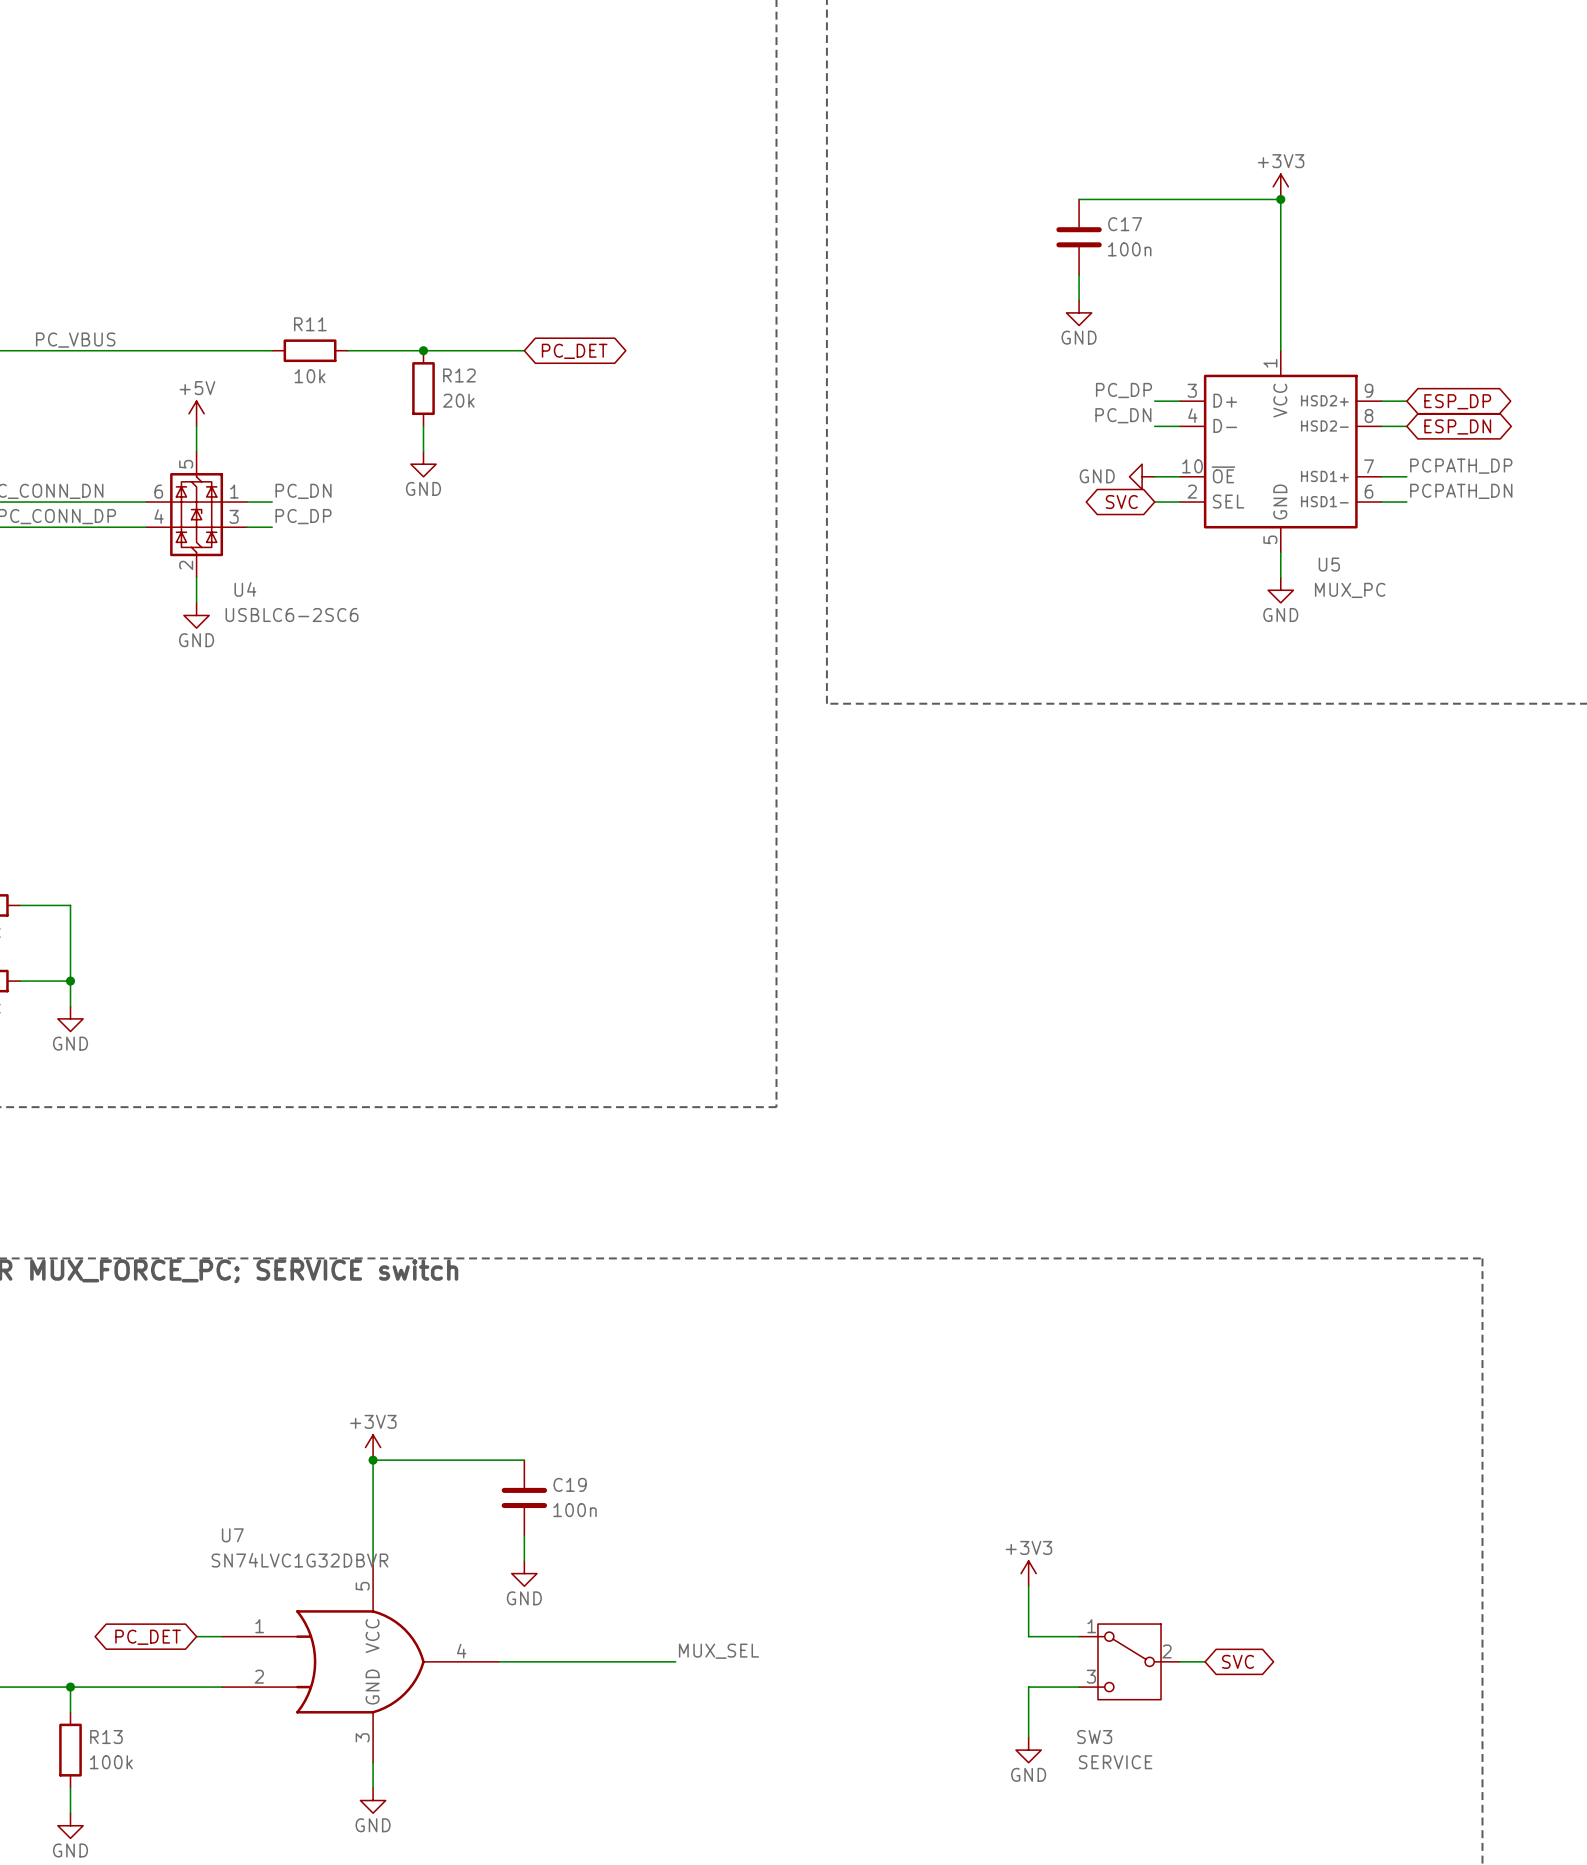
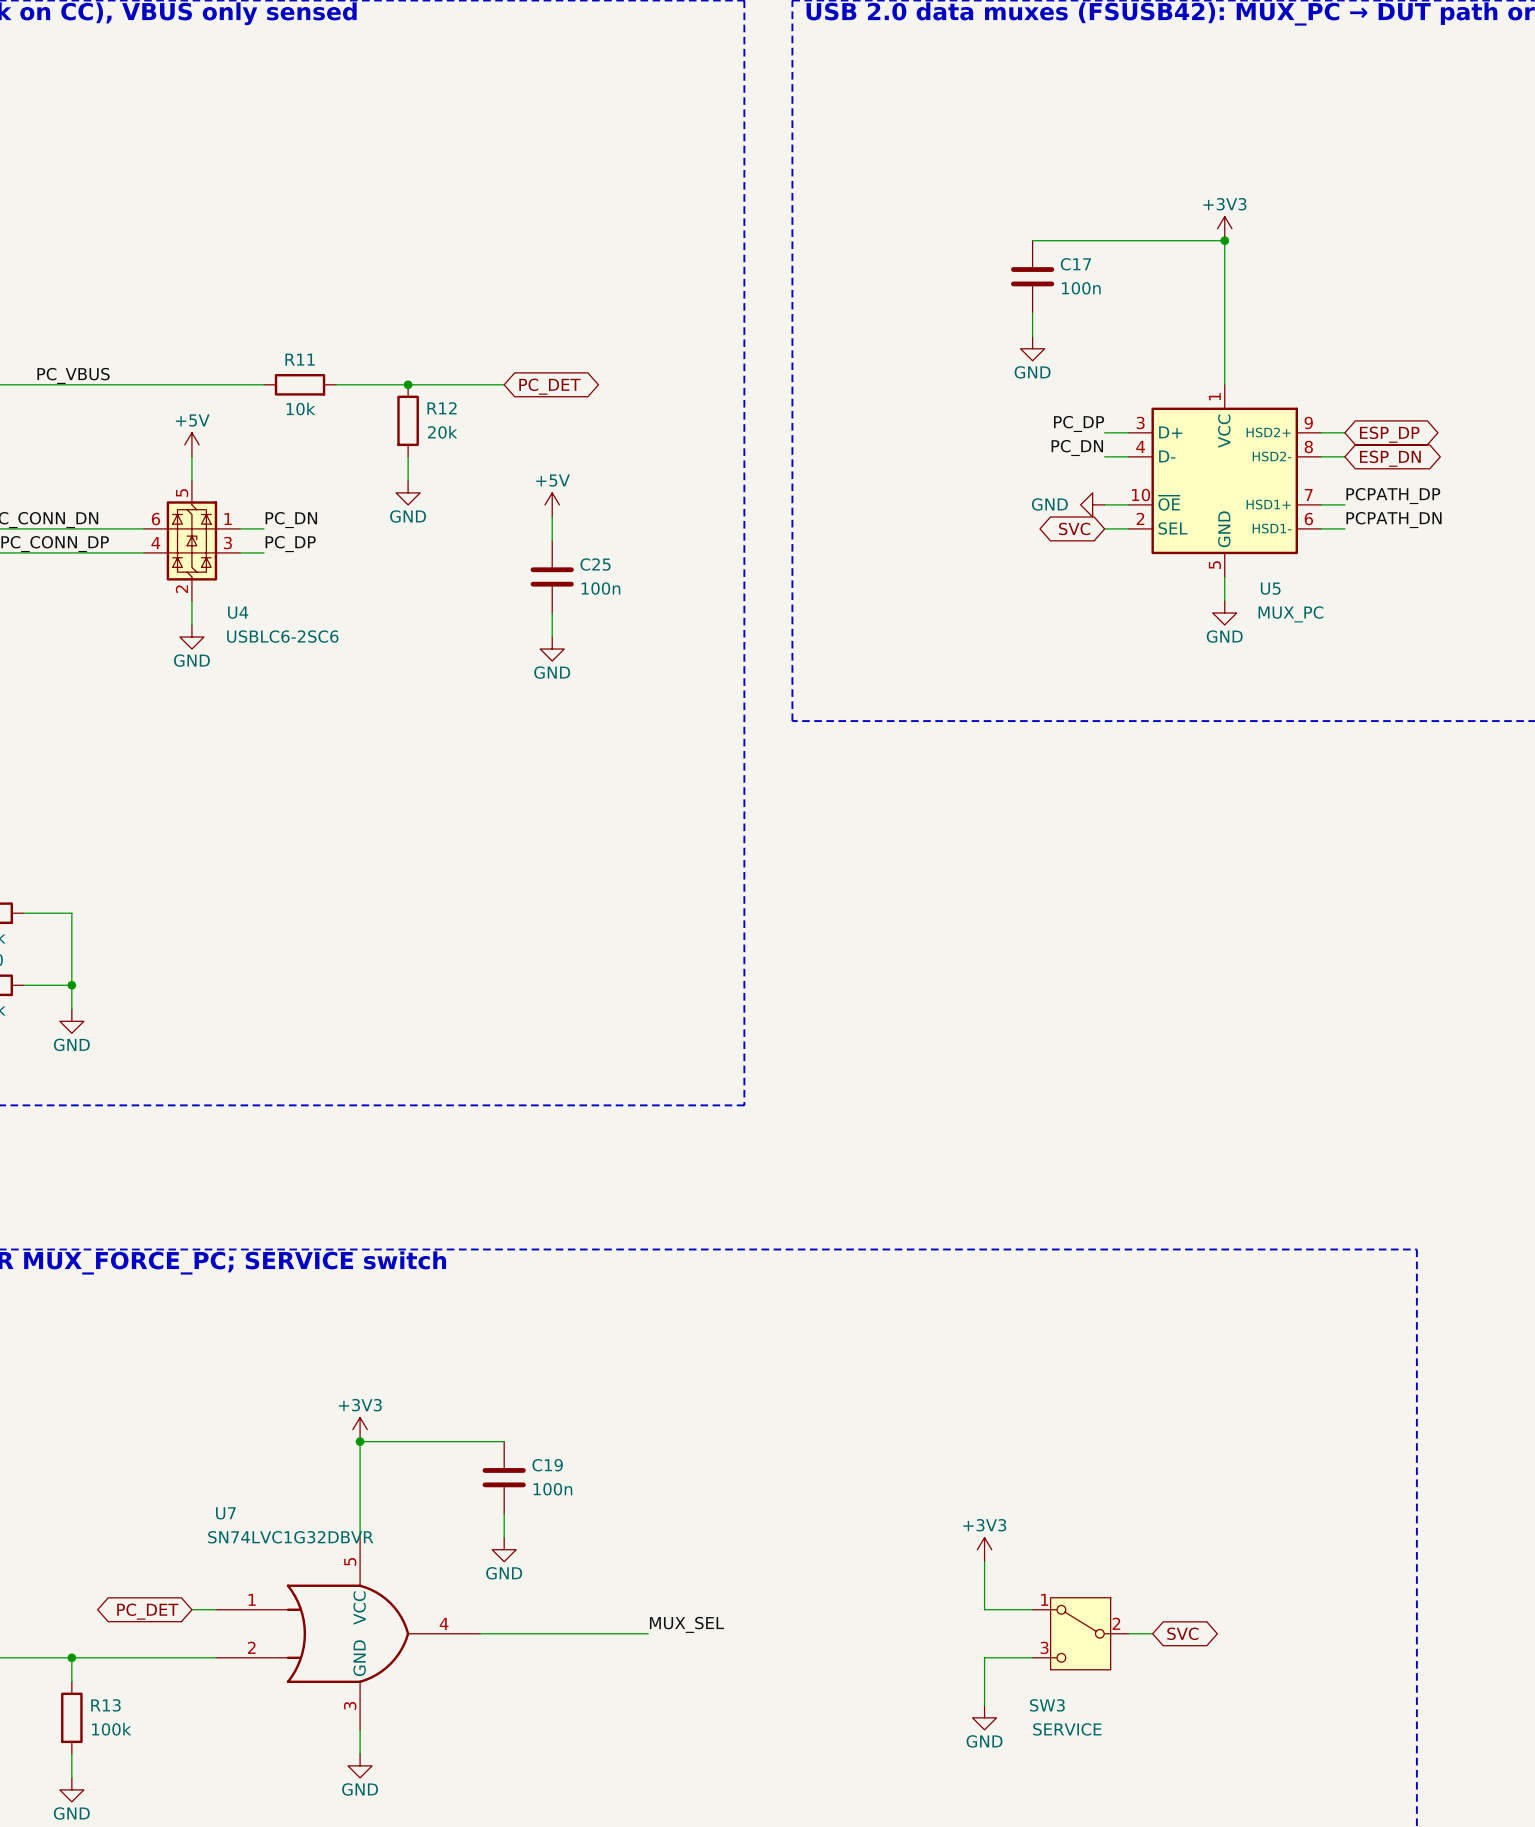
power symbol: none -> +5V (552, 504)
wire: none -> (552, 516) (552, 540)
C25: none -> 100n (552, 576)
wire: none -> (552, 612) (552, 637)
power symbol: none -> GND (552, 649)

